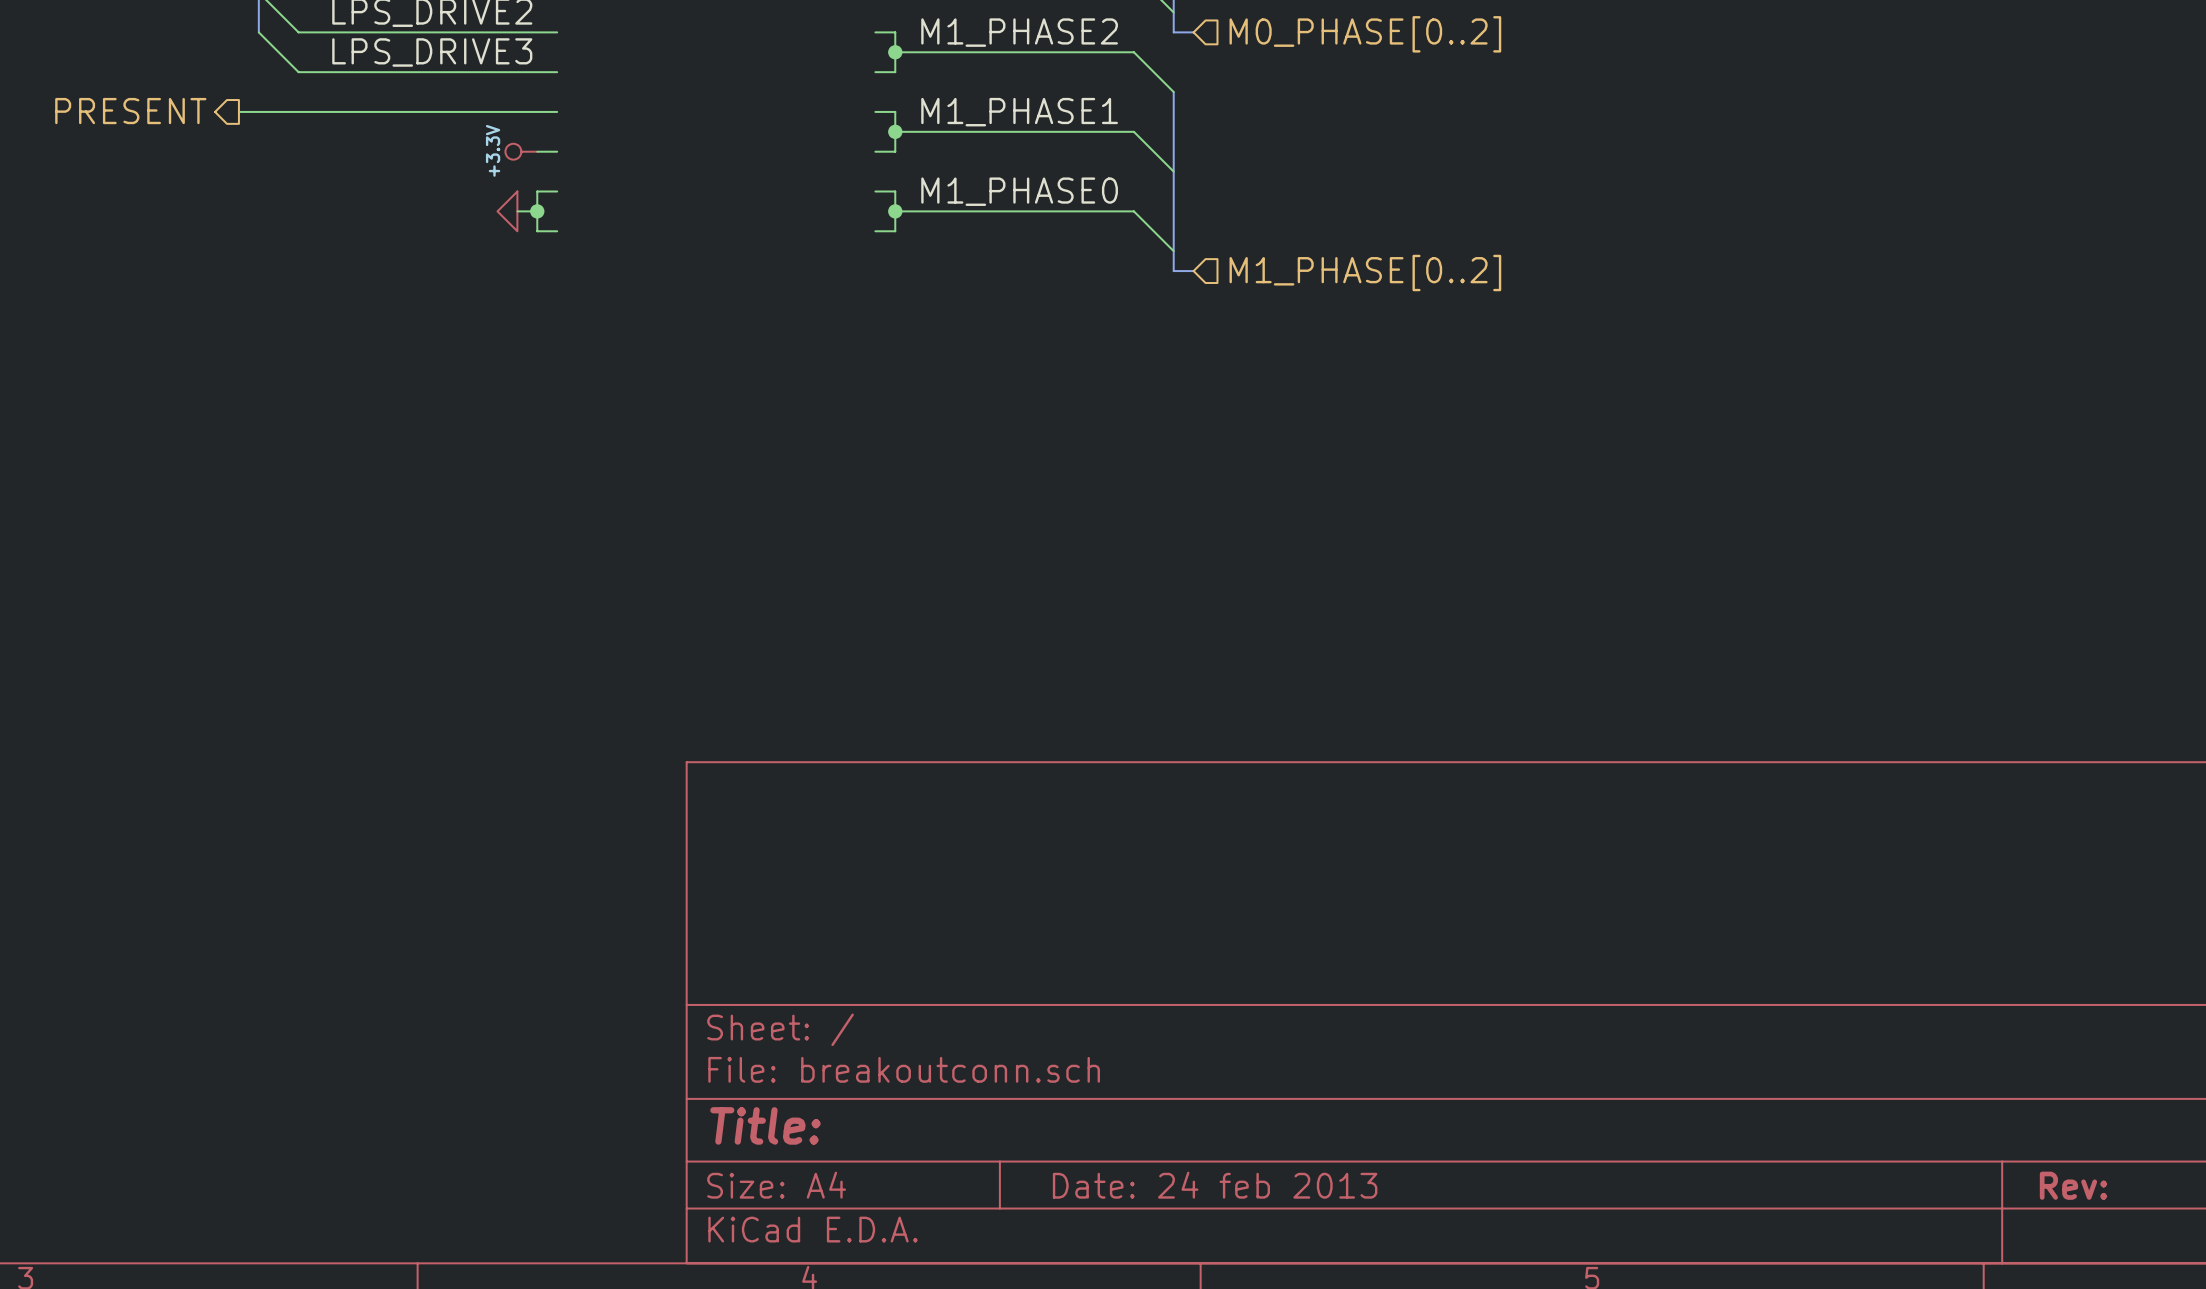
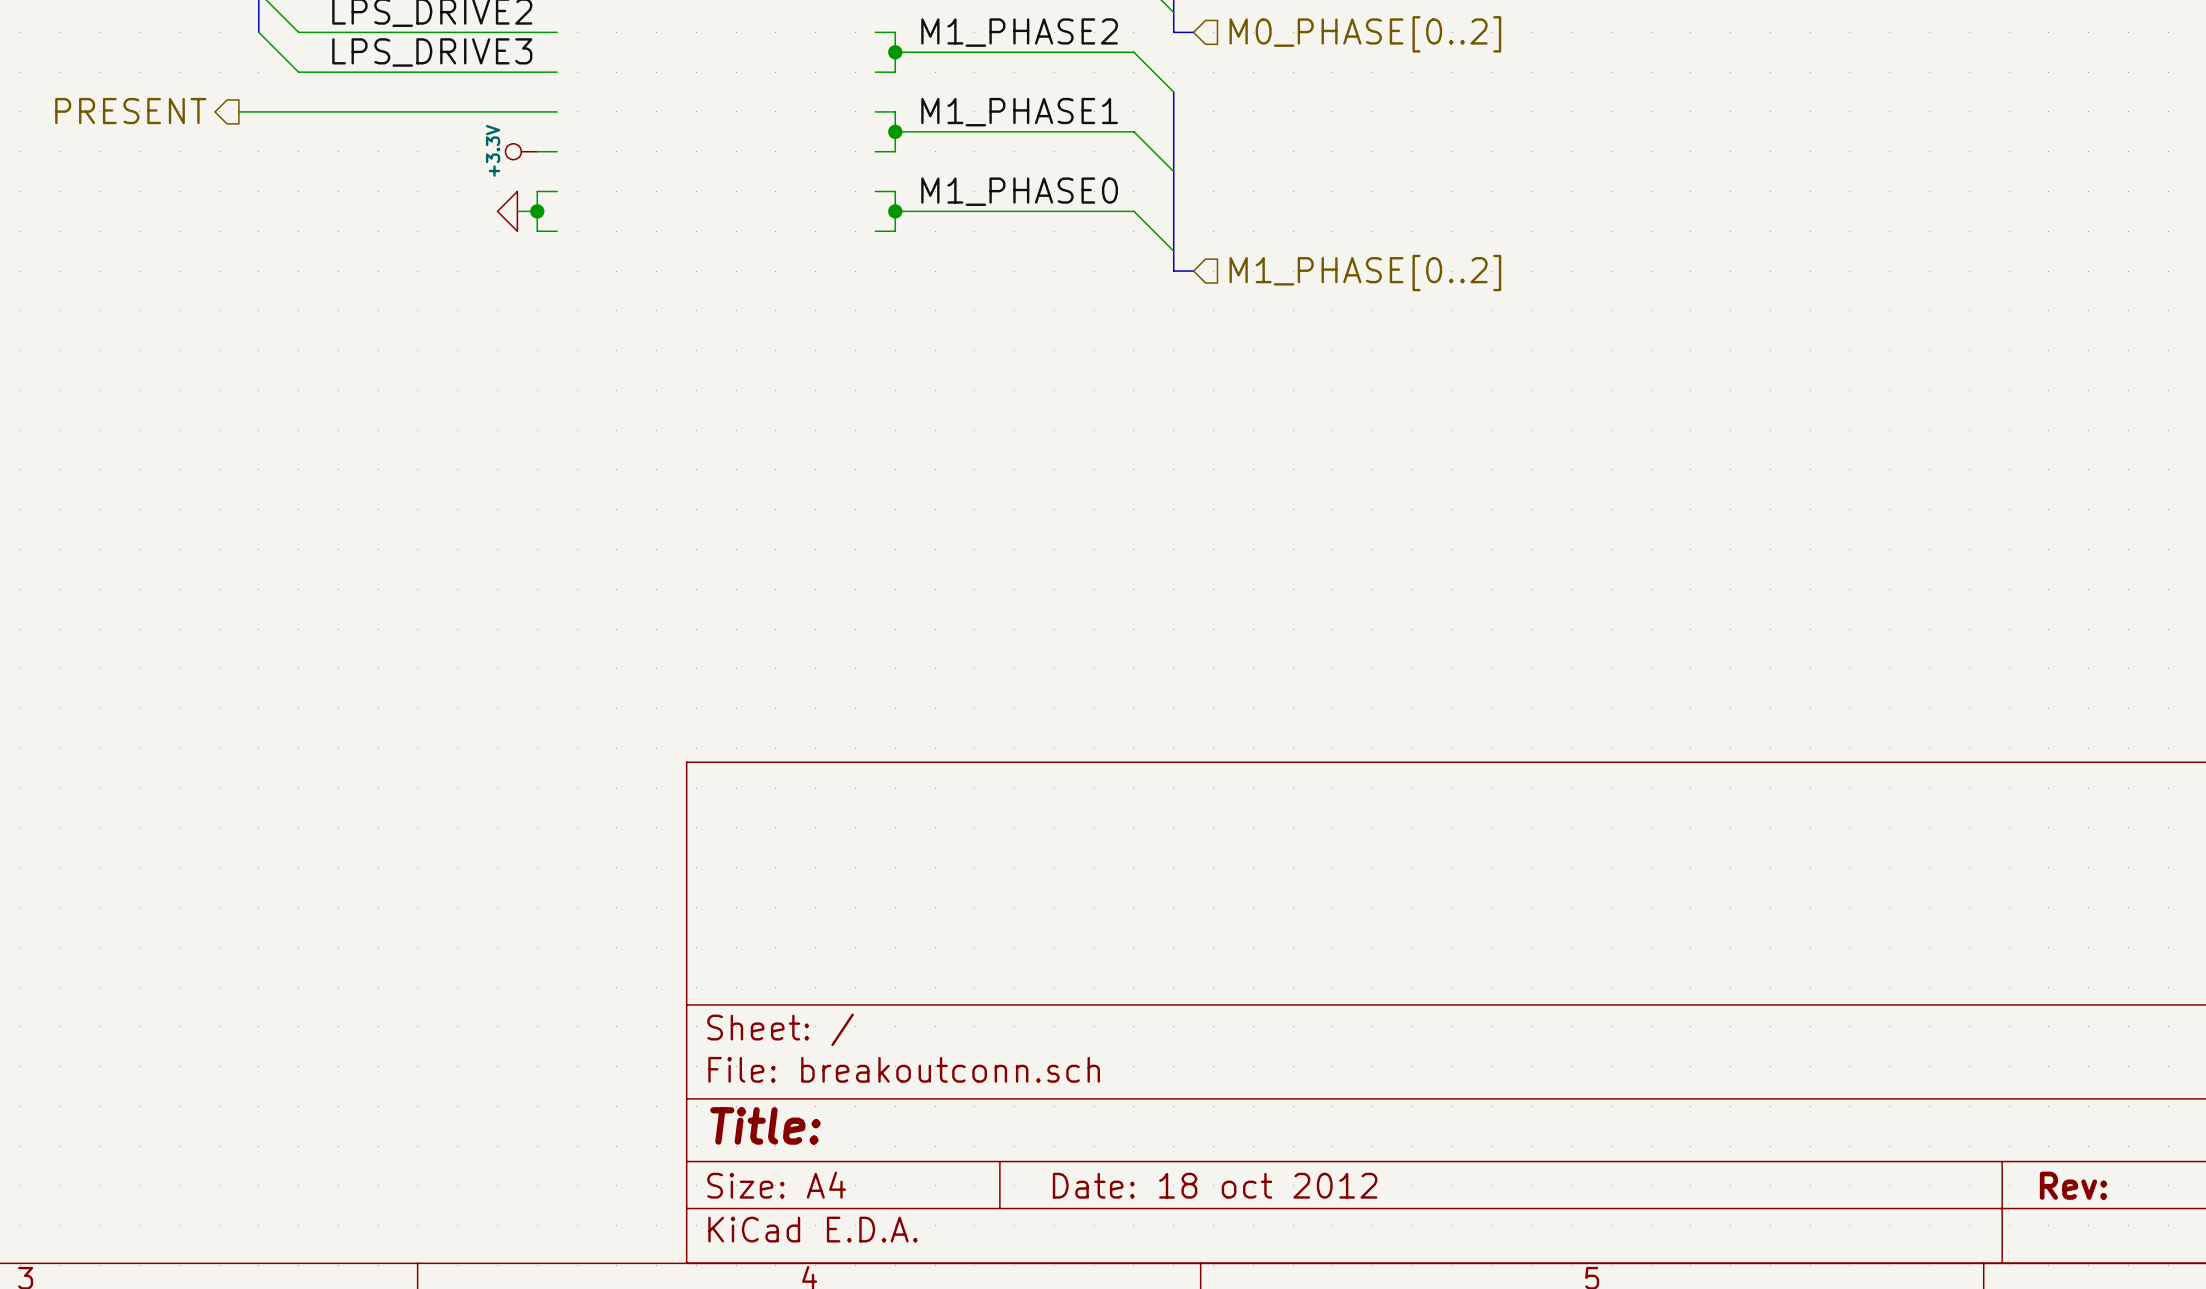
title block: Date: 24 feb 2013 (1215, 1185) -> Date: 18 oct 2012 (1215, 1185)

